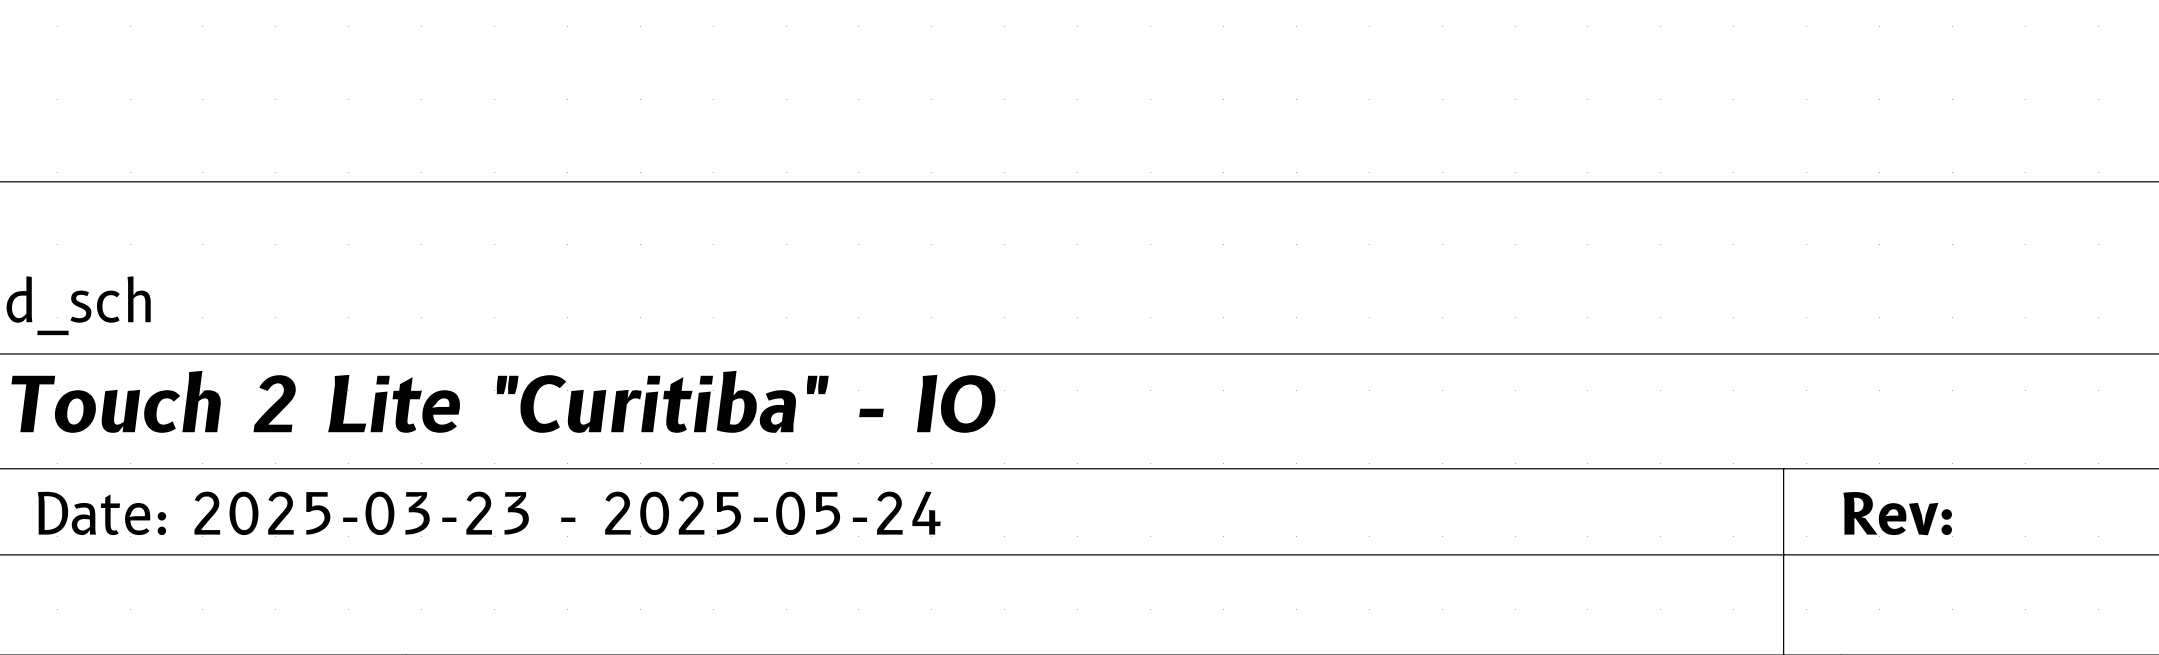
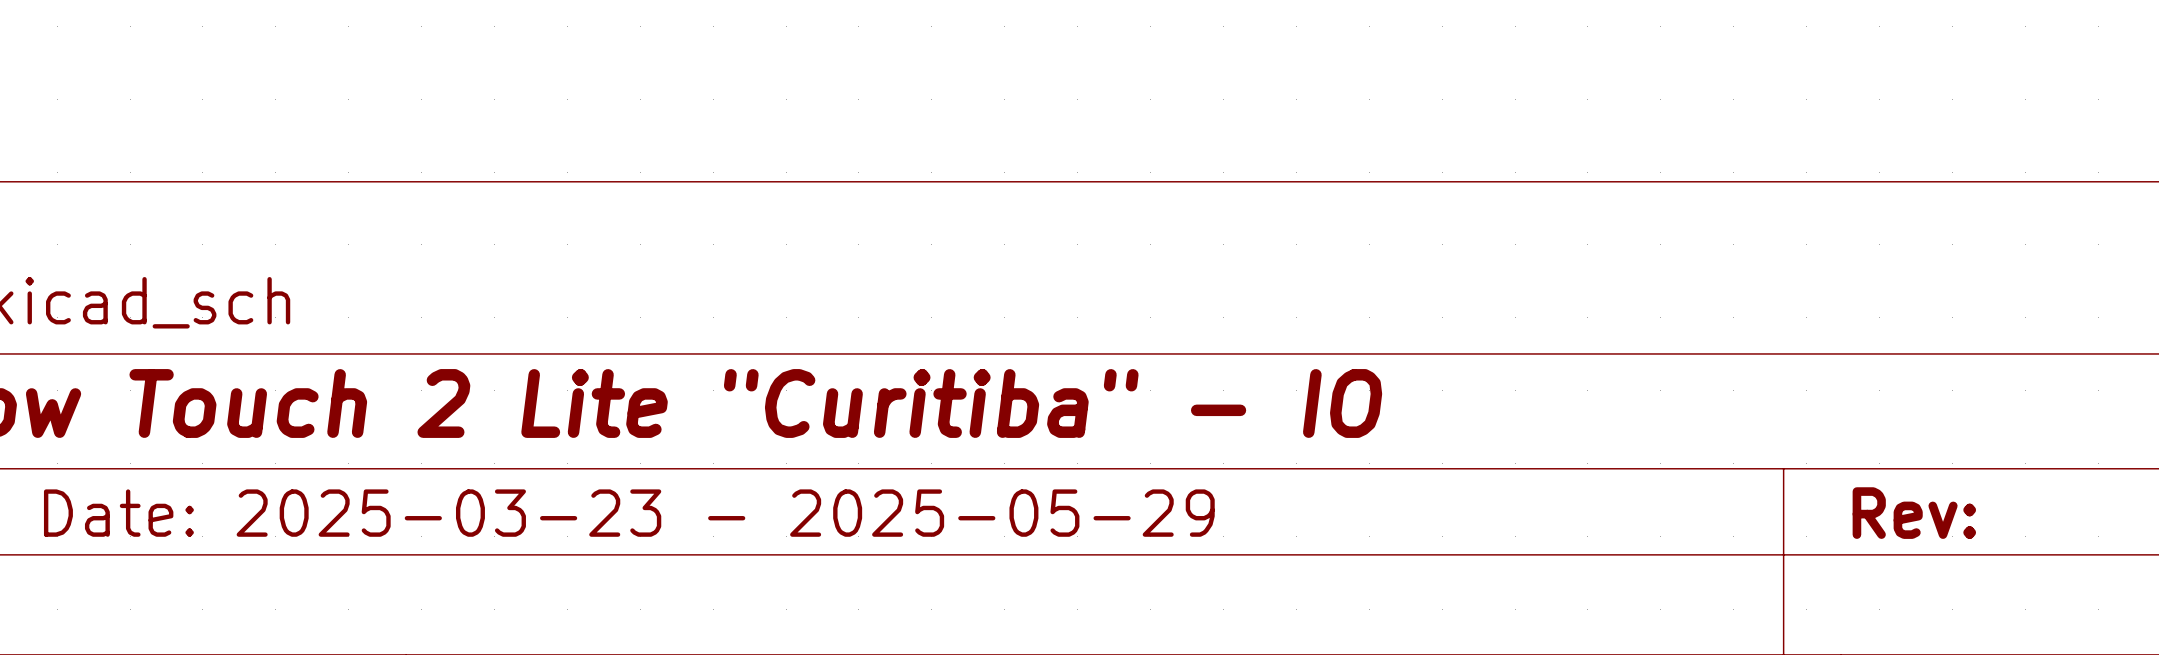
title block: Date: 2025-03-23 - 2025-05-24 (489, 513) -> Date: 2025-03-23 - 2025-05-29 (629, 513)

